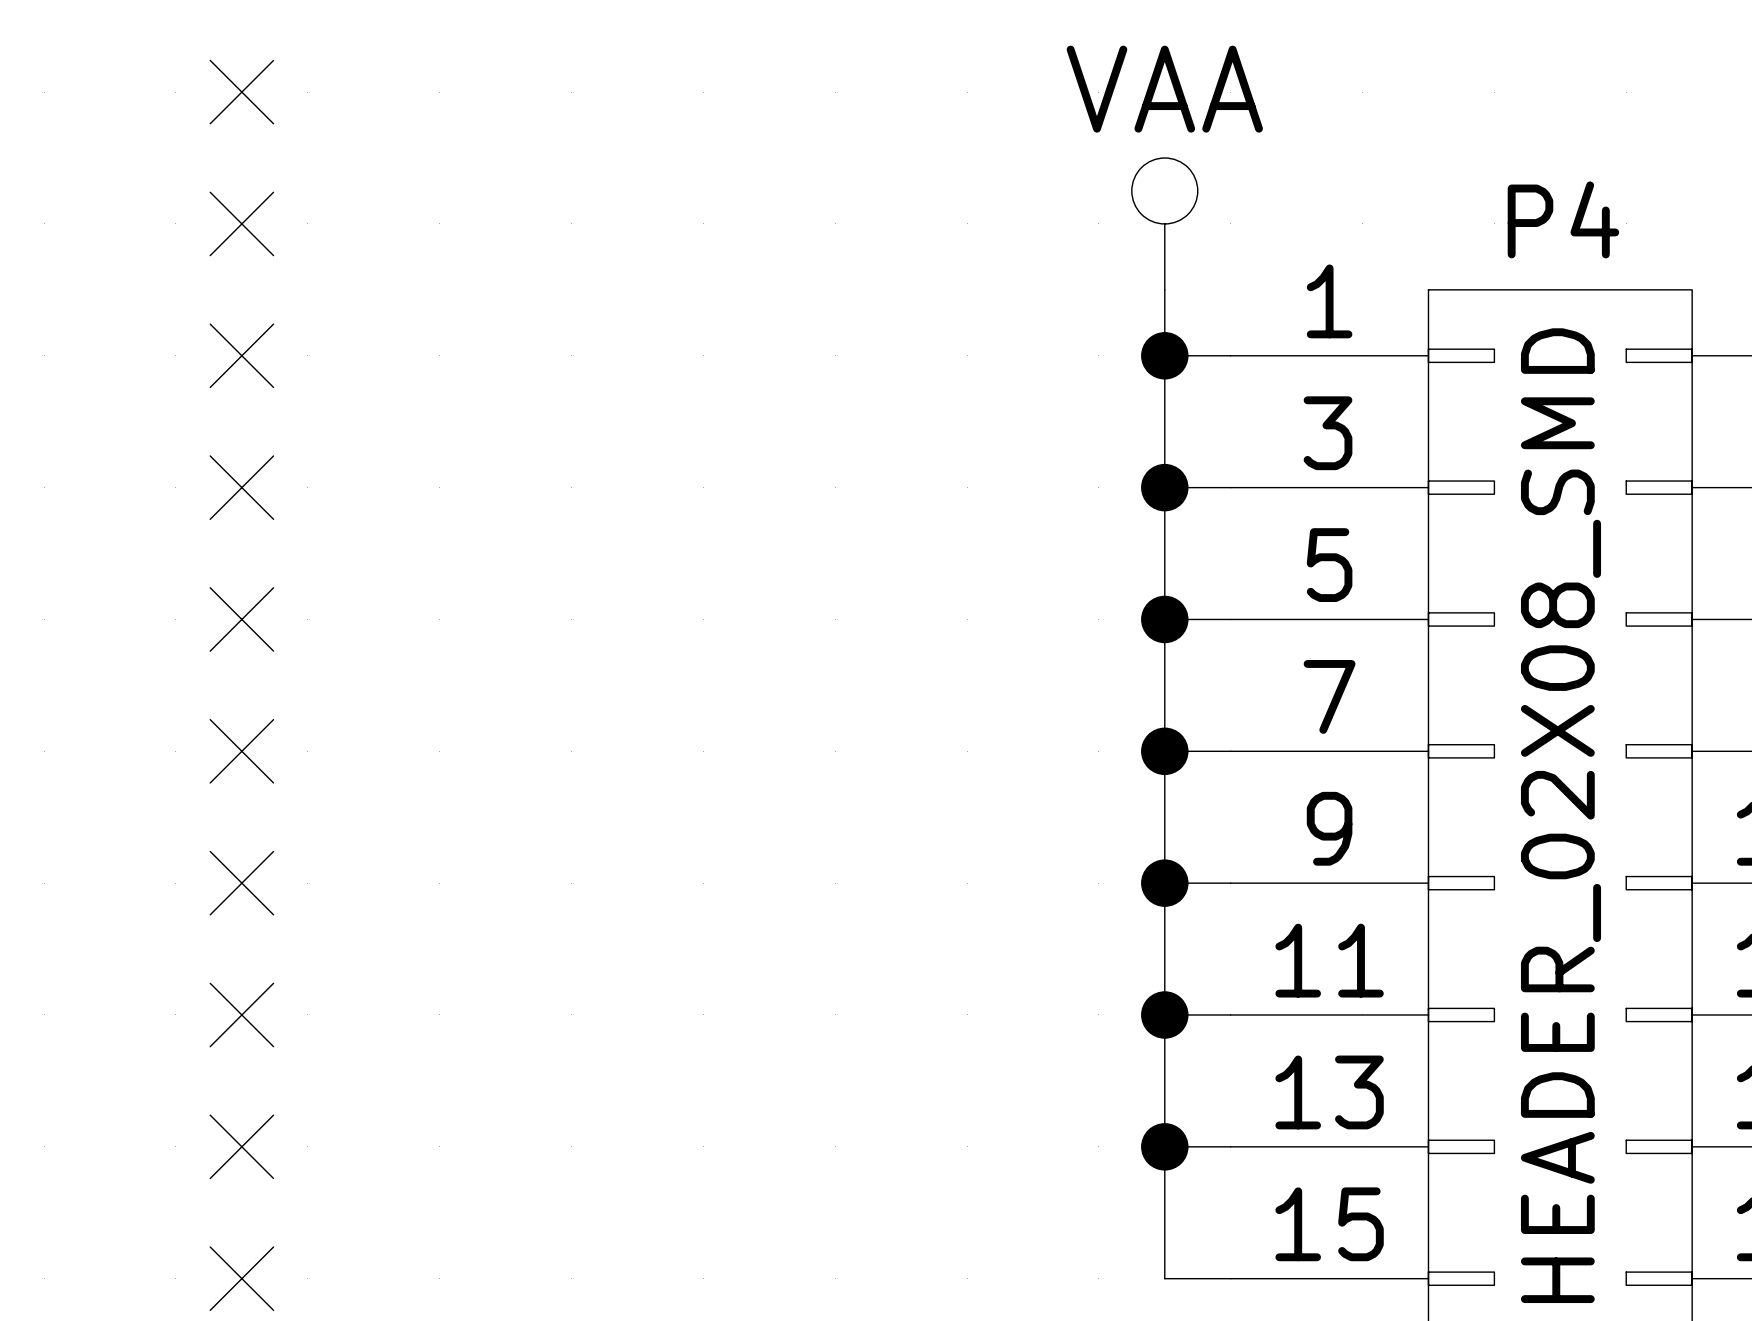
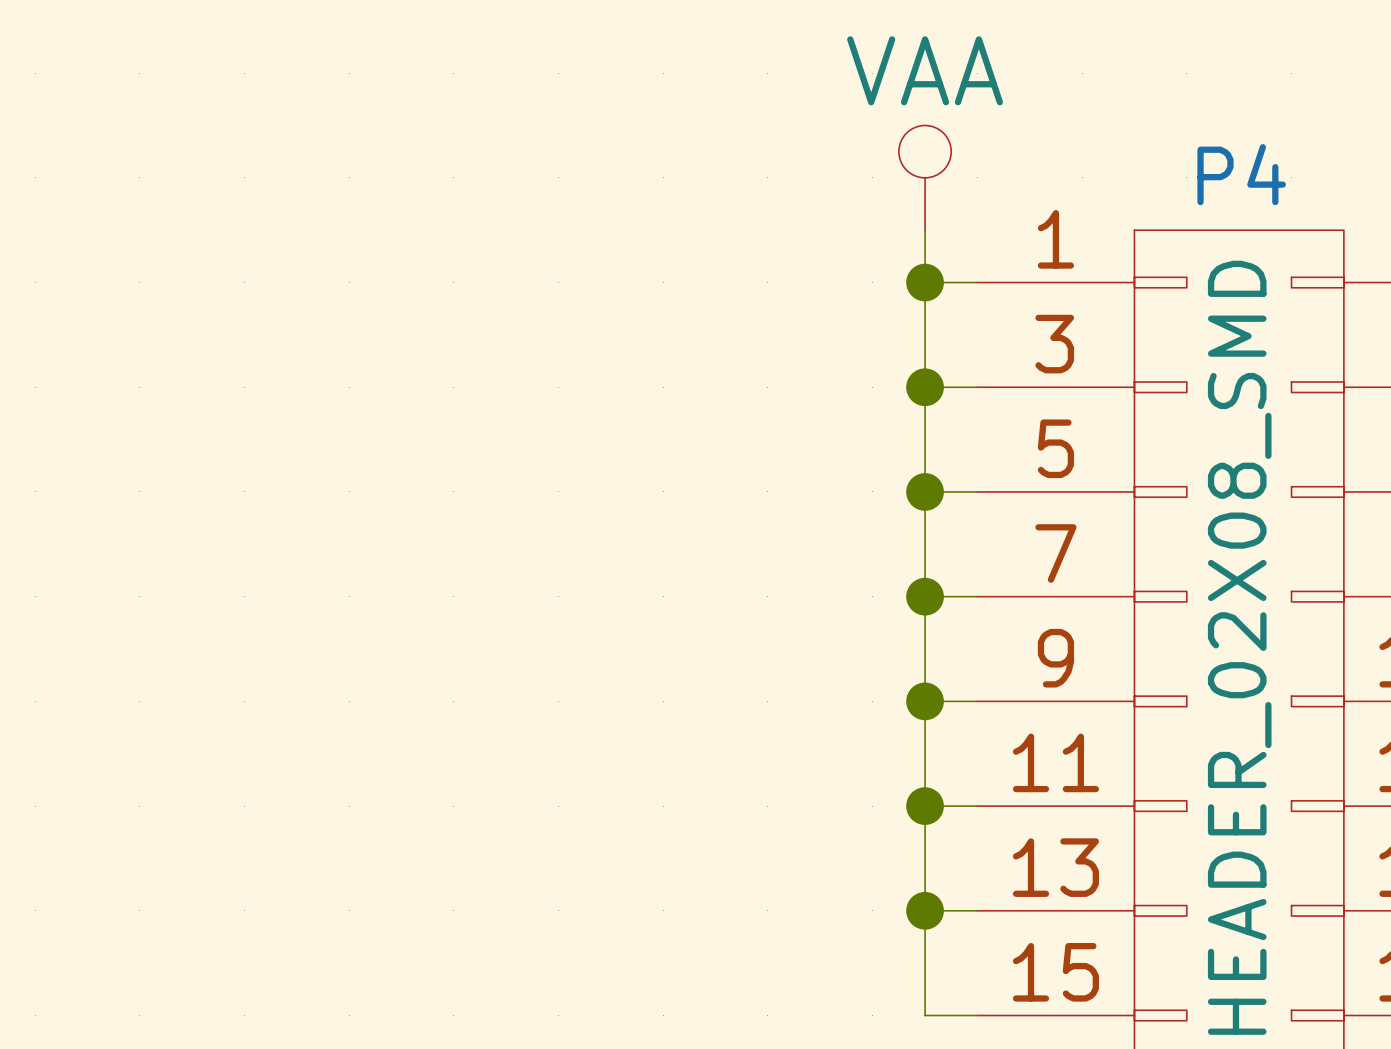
no-connect mark: (241, 92) -> none
no-connect mark: (241, 223) -> none
no-connect mark: (241, 355) -> none
no-connect mark: (241, 487) -> none
no-connect mark: (241, 619) -> none
no-connect mark: (241, 751) -> none
no-connect mark: (241, 883) -> none
no-connect mark: (241, 1014) -> none
no-connect mark: (241, 1146) -> none
no-connect mark: (241, 1278) -> none

